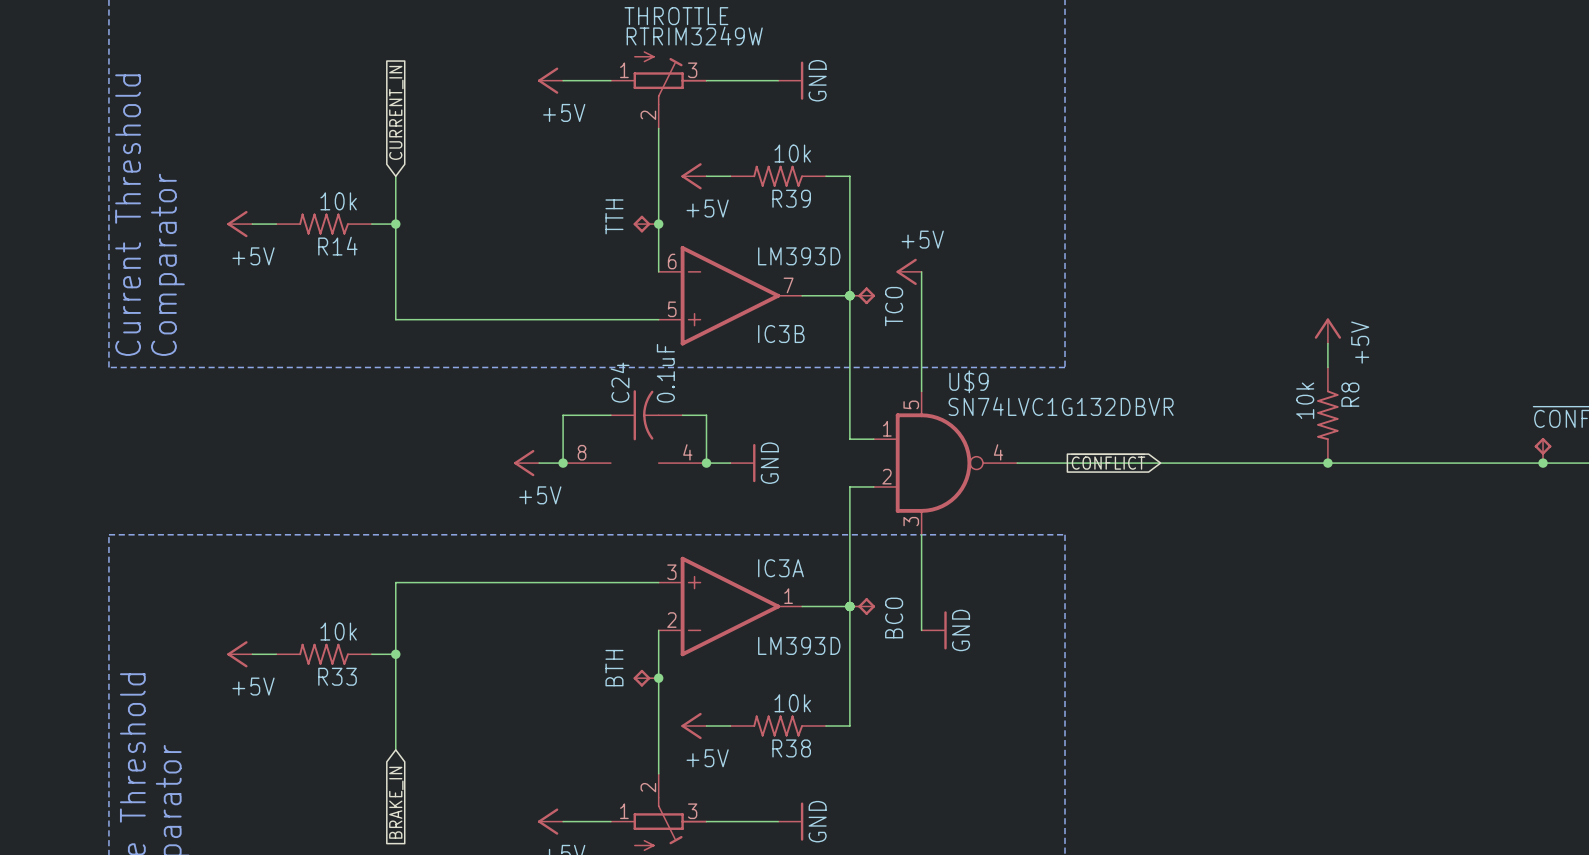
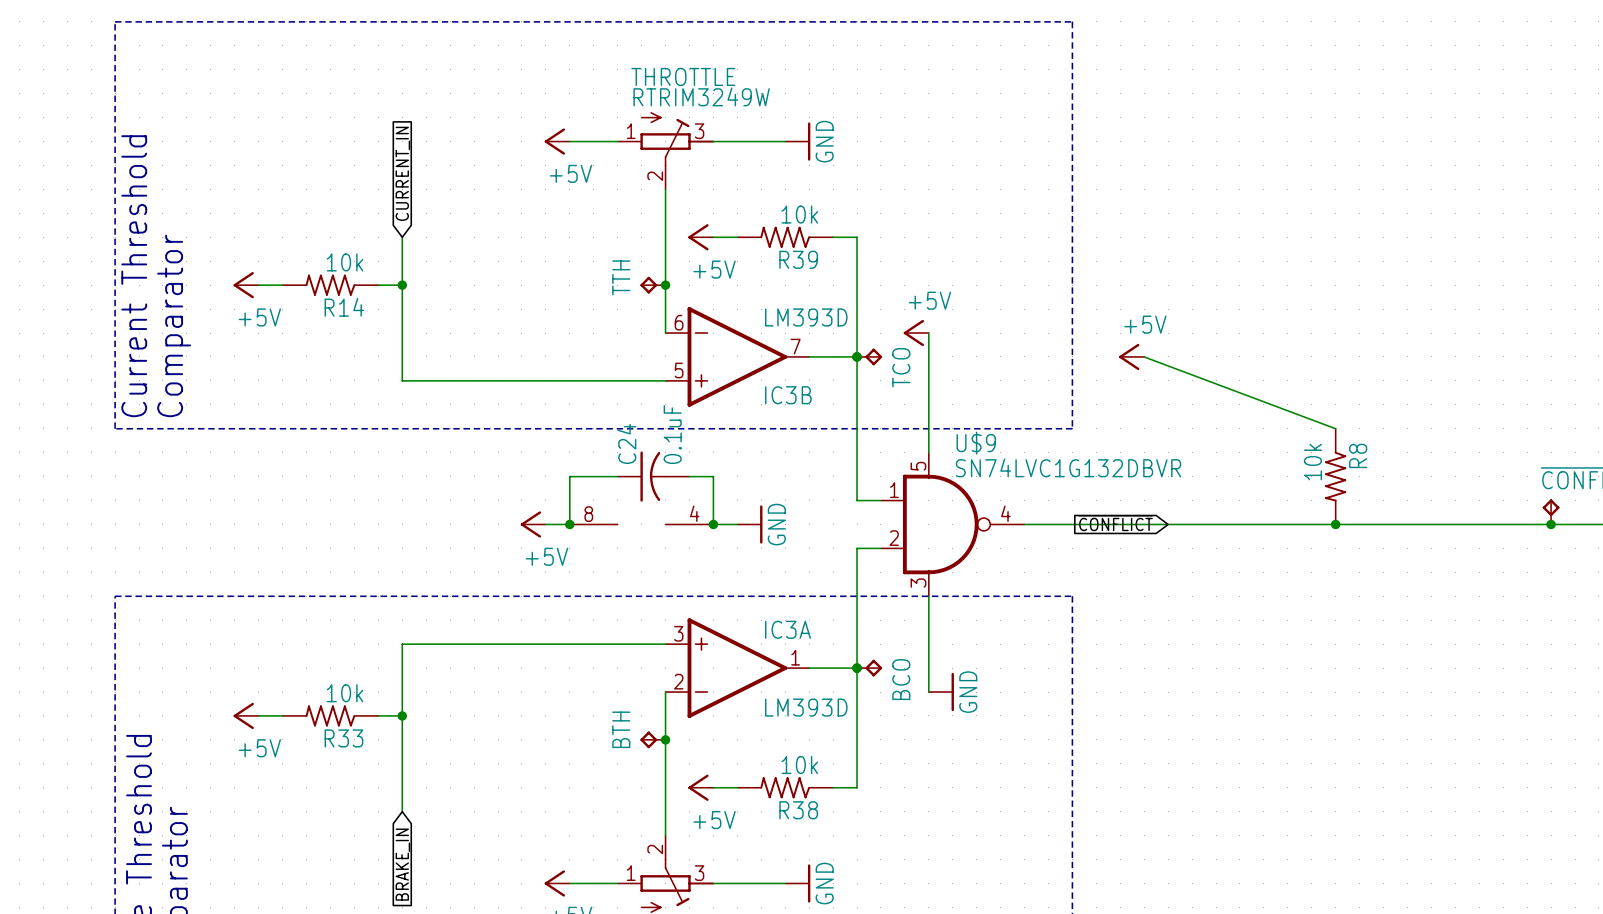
power symbol rotation: 0° (1327, 328) -> 90° counterclockwise (1129, 356)
power symbol position: +5V (1327, 331) -> +5V (1131, 356)
wire: (1327, 343) (1327, 367) -> (1144, 356) (1335, 428)

